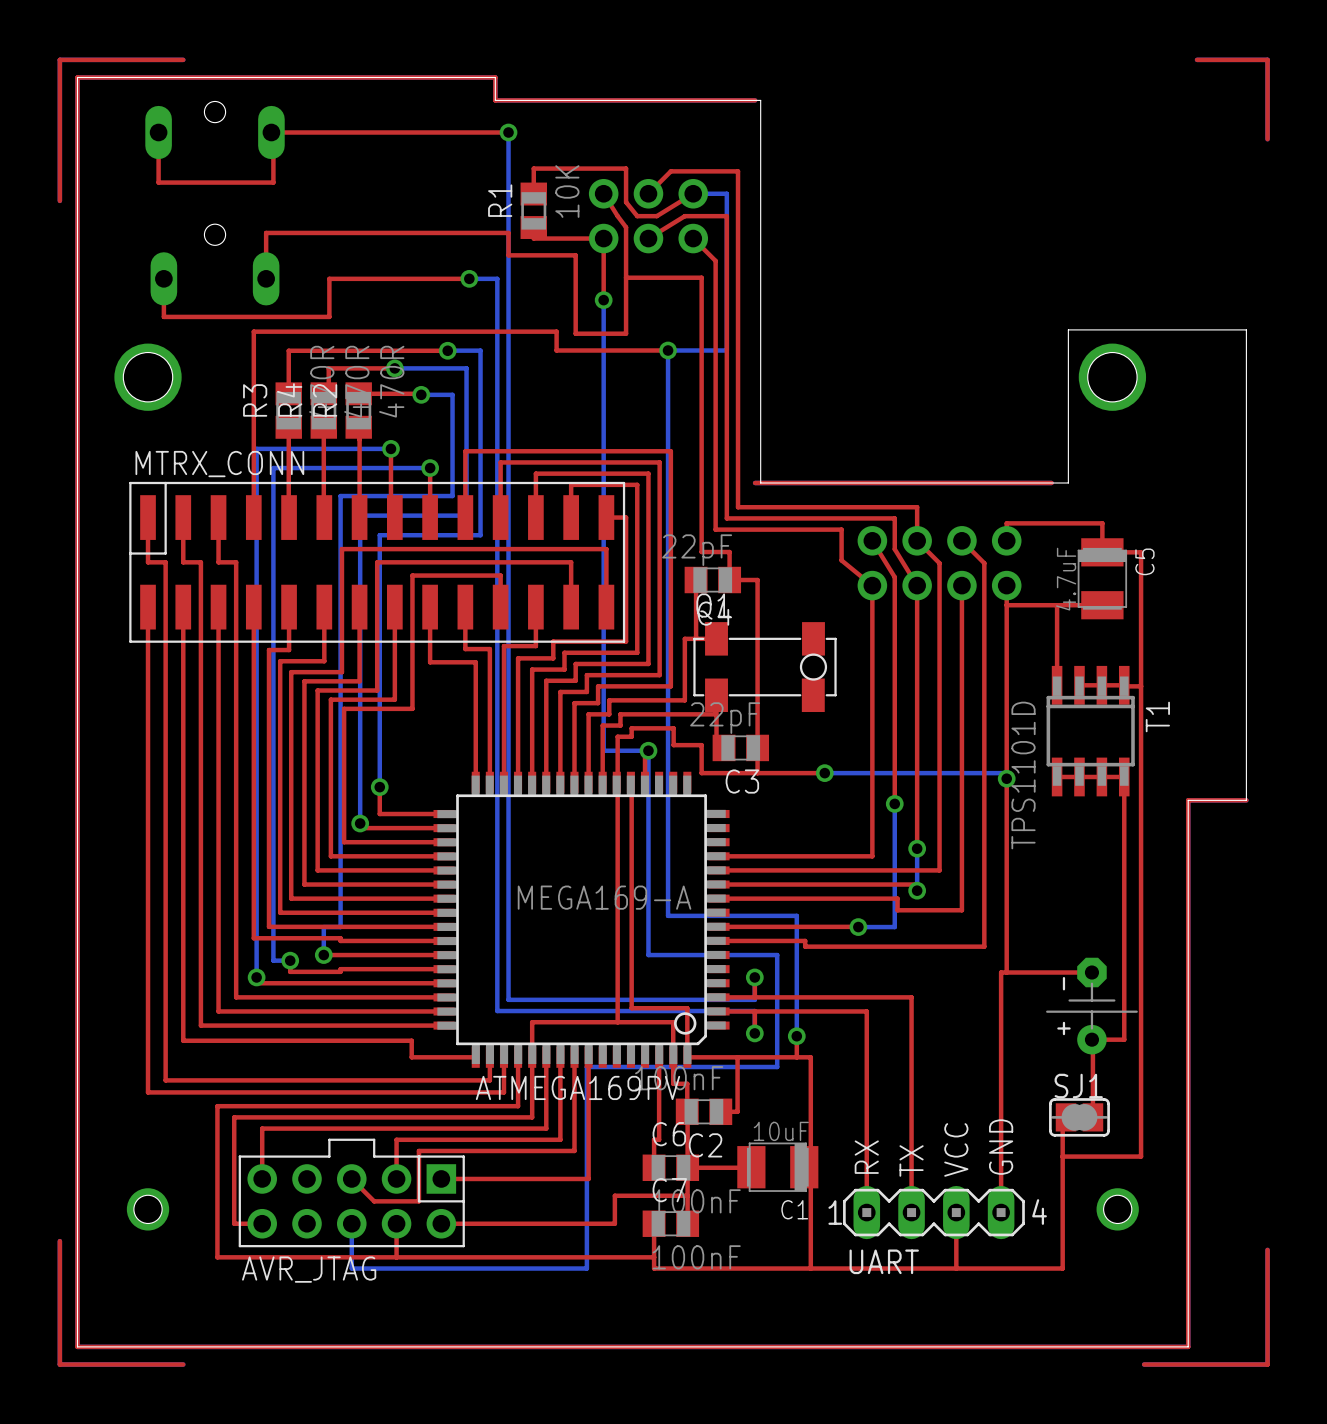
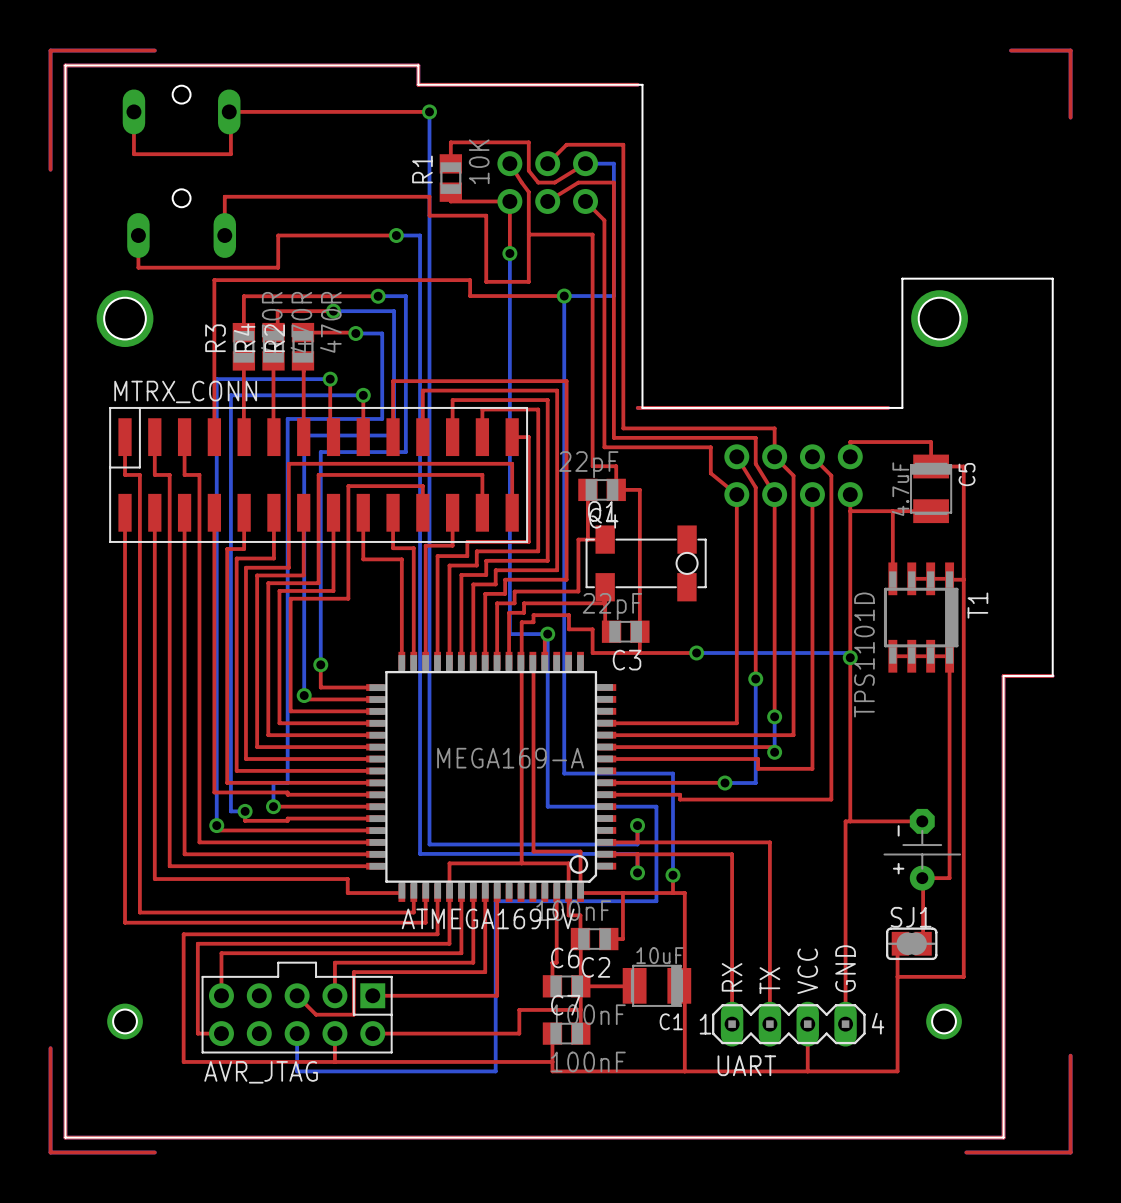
T1 footprint: [1046, 665, 1135, 797] -> [883, 562, 959, 673]

